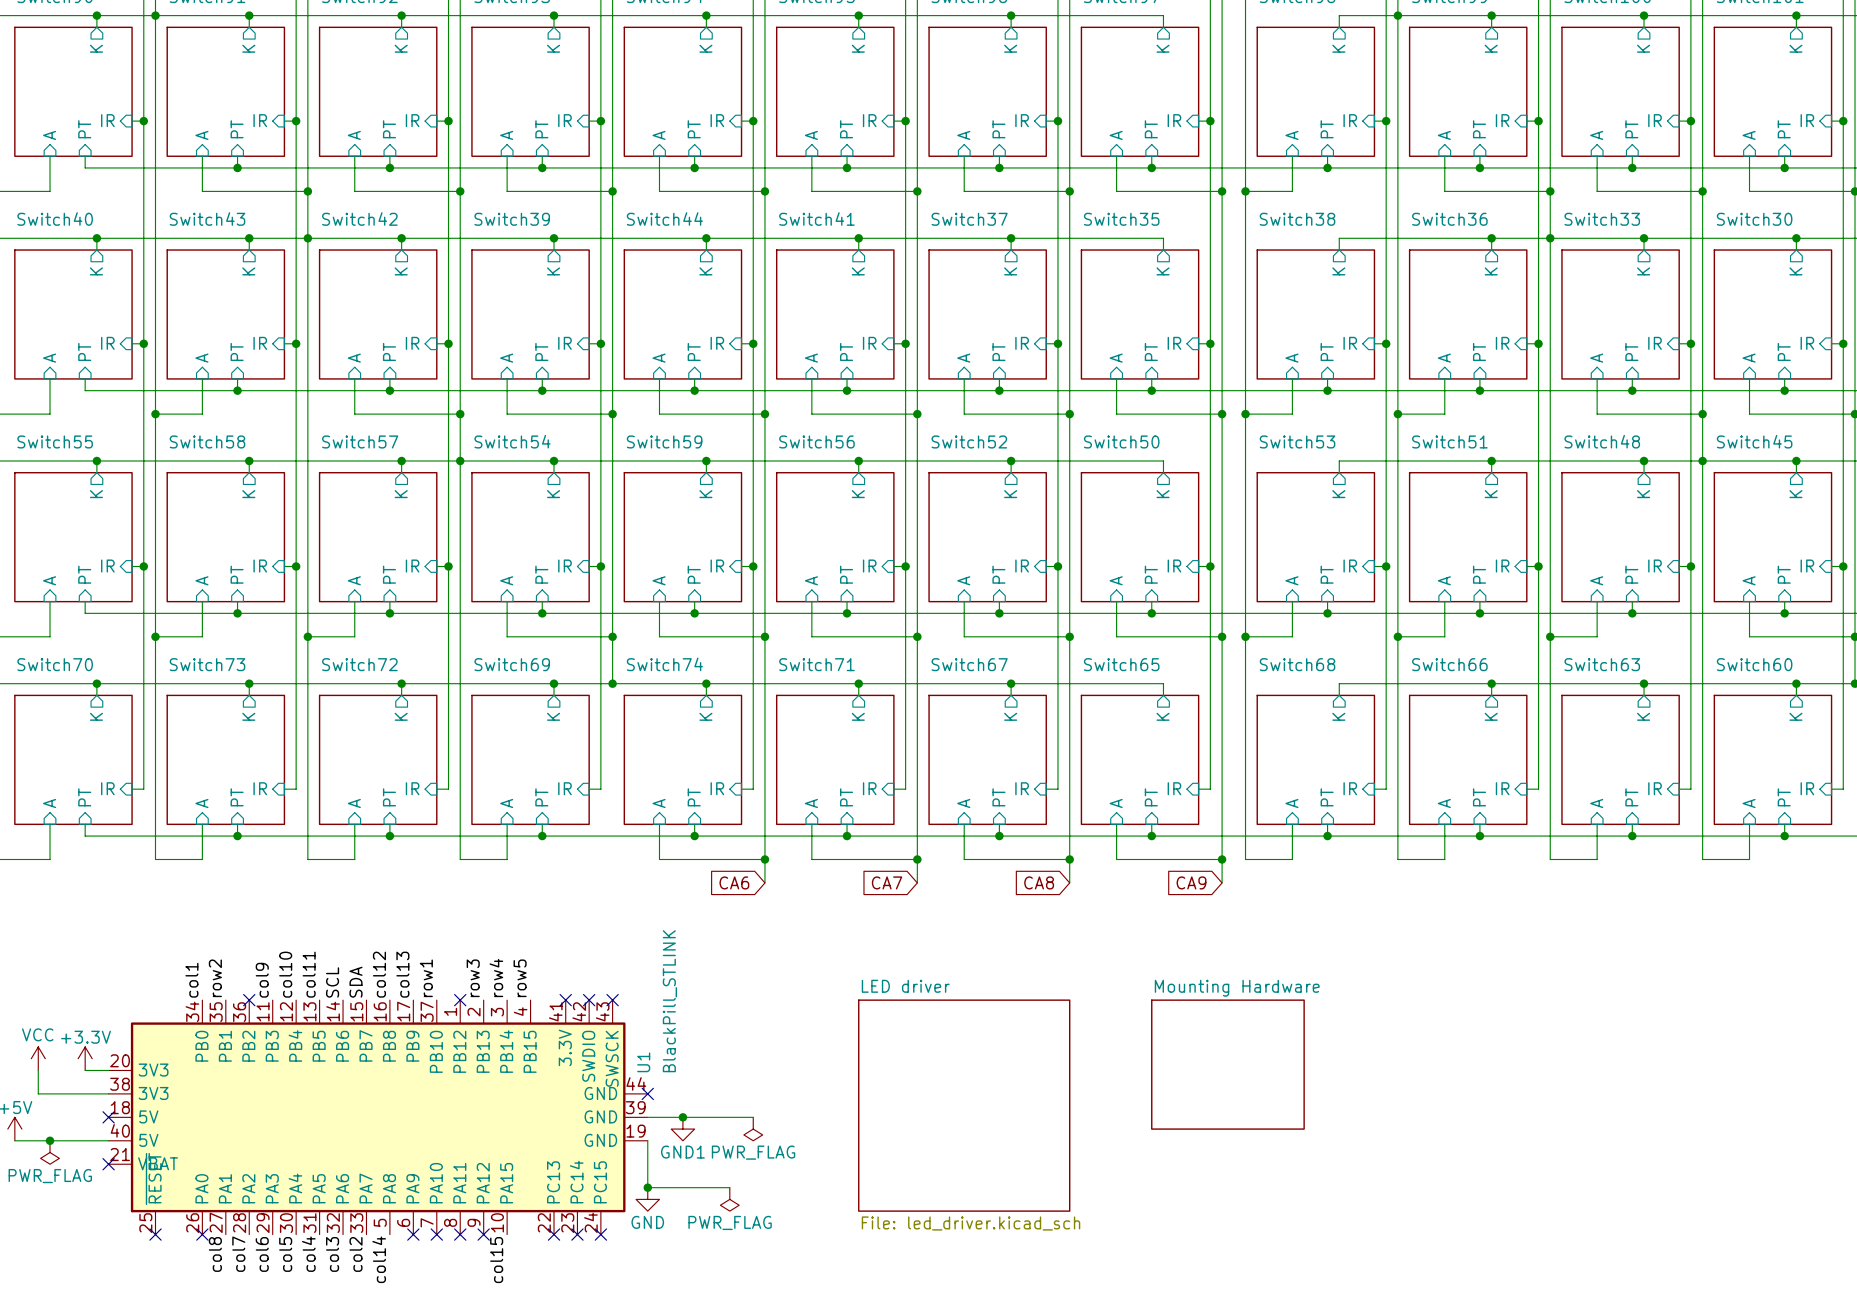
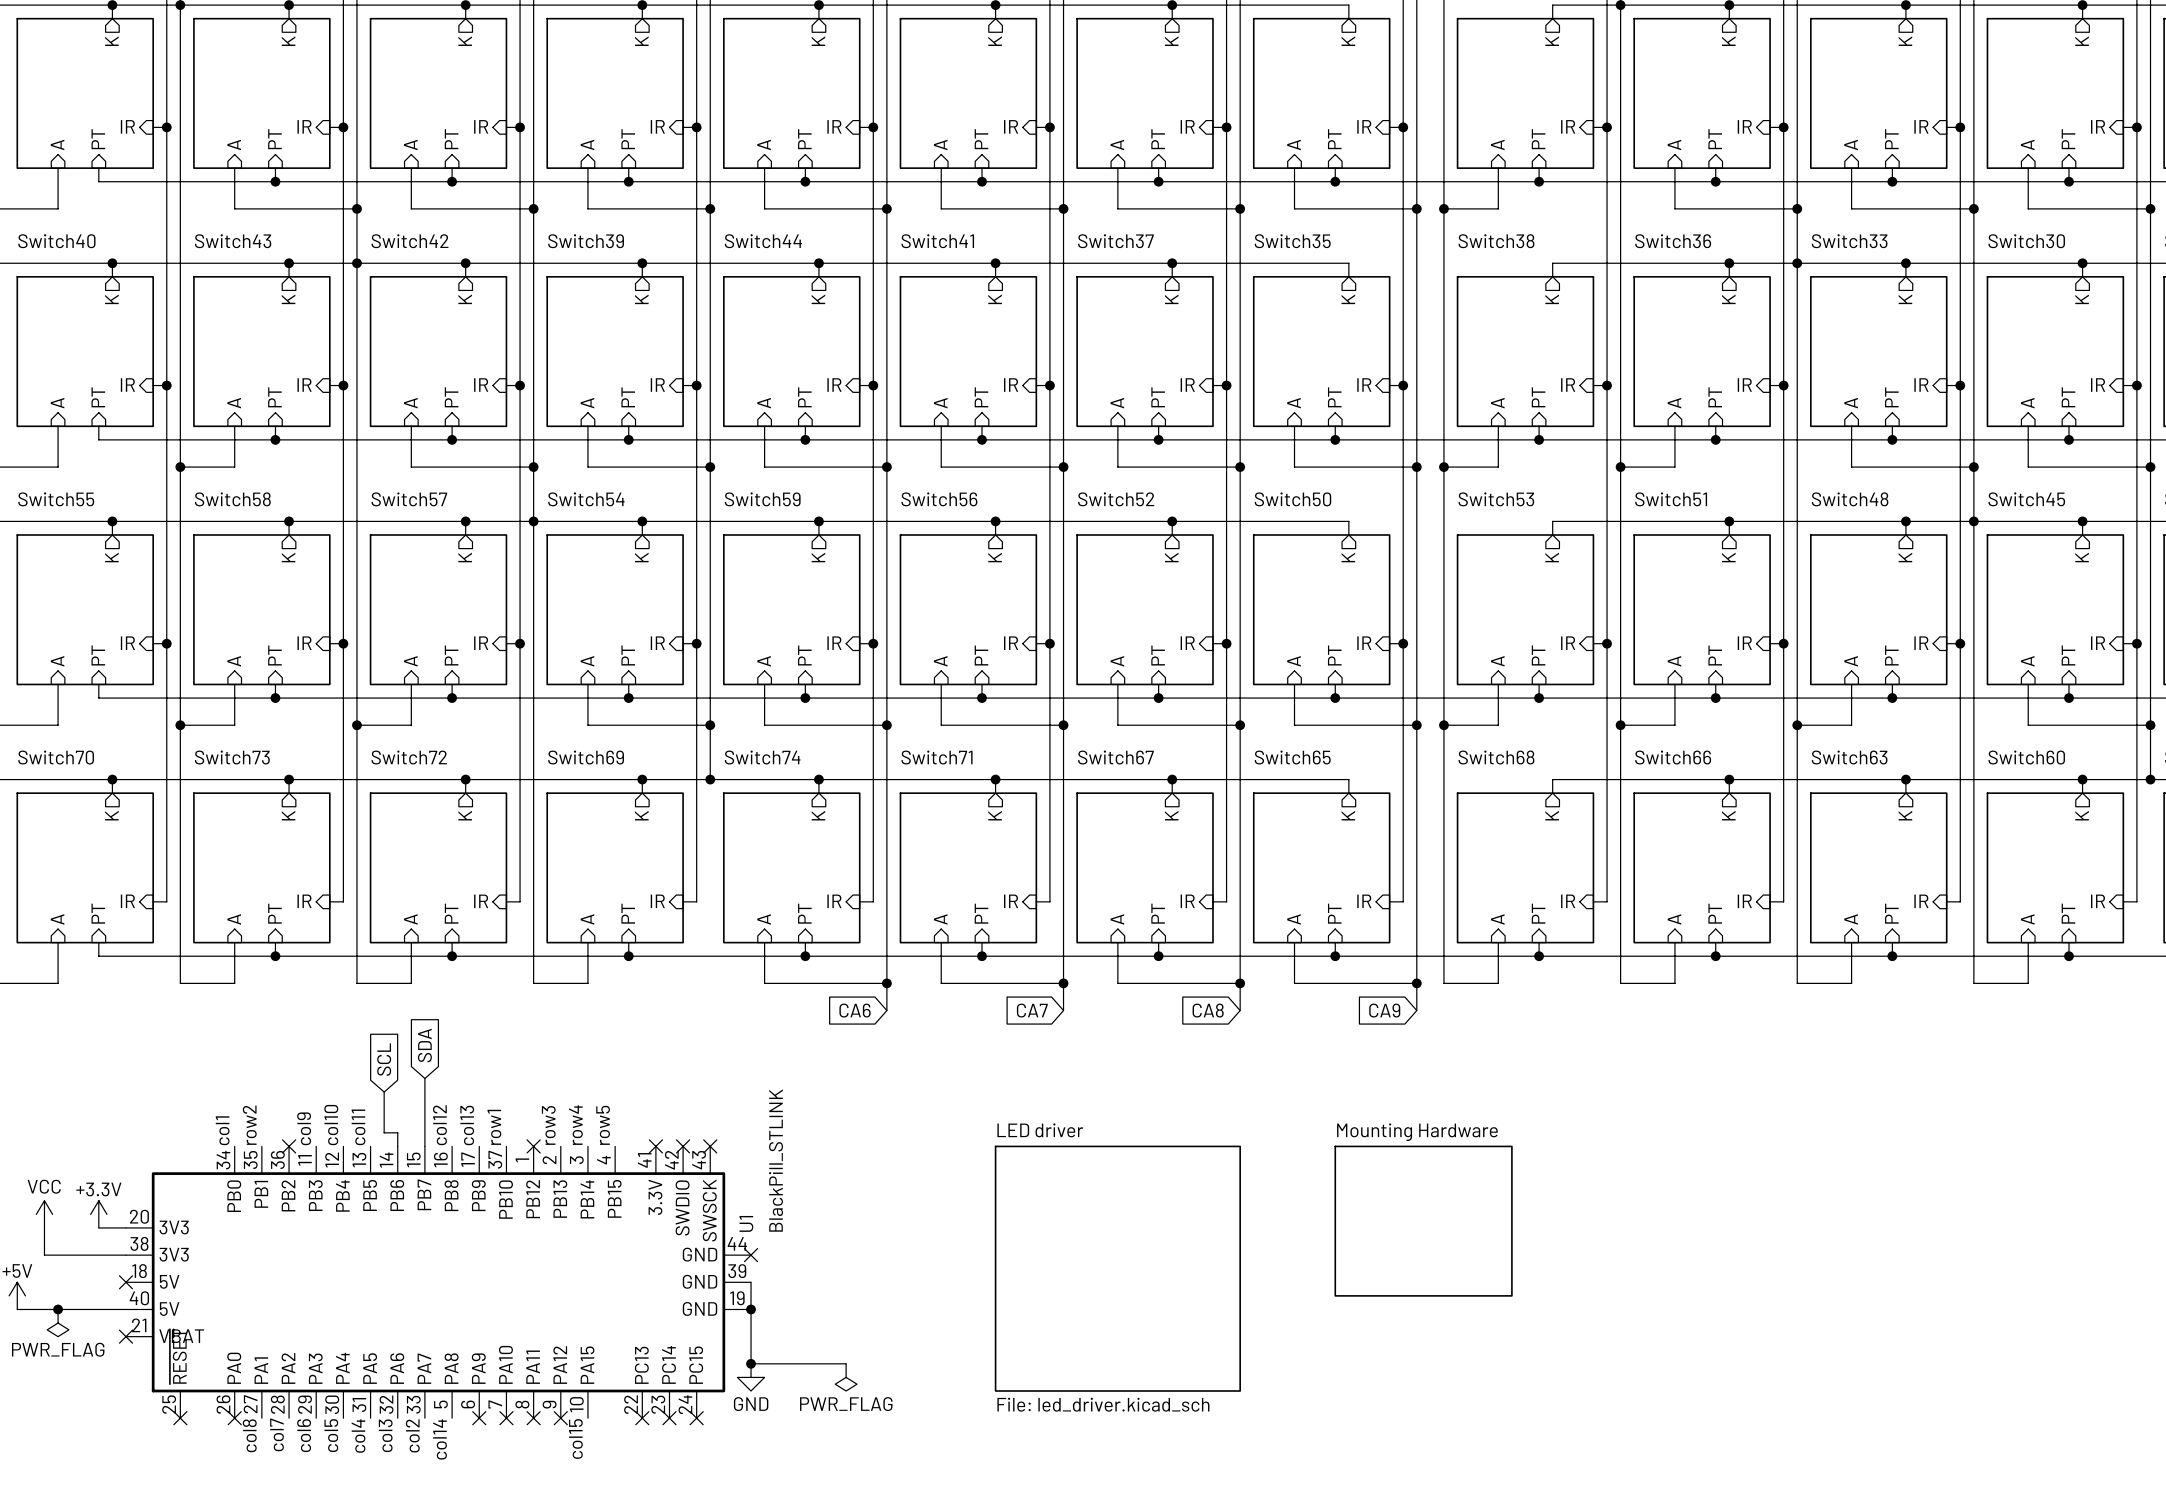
global label: none -> SDA (424, 1045)
global label: none -> SCL (384, 1059)
wire: none -> (424, 1078) (424, 1146)
wire: none -> (384, 1092) (384, 1132) (397, 1132) (397, 1146)
label: SCL (332, 982) -> none
label: SDA (356, 982) -> none
wire: (647, 1117) (753, 1117) -> (751, 1282) (751, 1309)
junction position: (682, 1117) -> (751, 1309)
power symbol: GND1 (682, 1129) -> none
power symbol: PWR_FLAG (753, 1129) -> none

